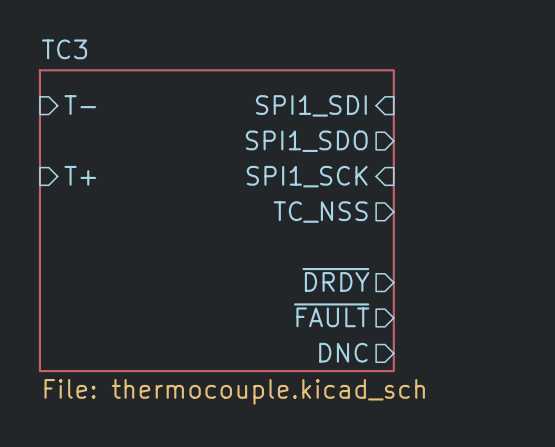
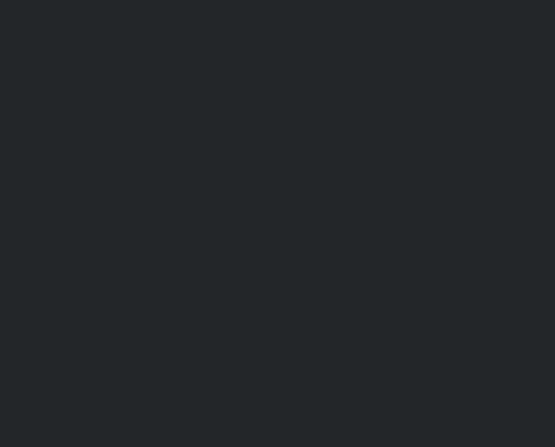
sheet pin: T- (80, 105) -> none
sheet pin: SPI1_SDI (311, 105) -> none
sheet pin: SPI1_SDO (306, 141) -> none
sheet pin: T+ (80, 175) -> none
sheet pin: SPI1_SCK (307, 176) -> none
sheet pin: TC_NSS (320, 212) -> none
sheet TC3: File: thermocouple.kicad_sch (216, 220) -> none
sheet pin: ~{DRDY} (335, 279) -> none
sheet pin: ~{FAULT} (331, 315) -> none
sheet pin: DNC (343, 352) -> none

